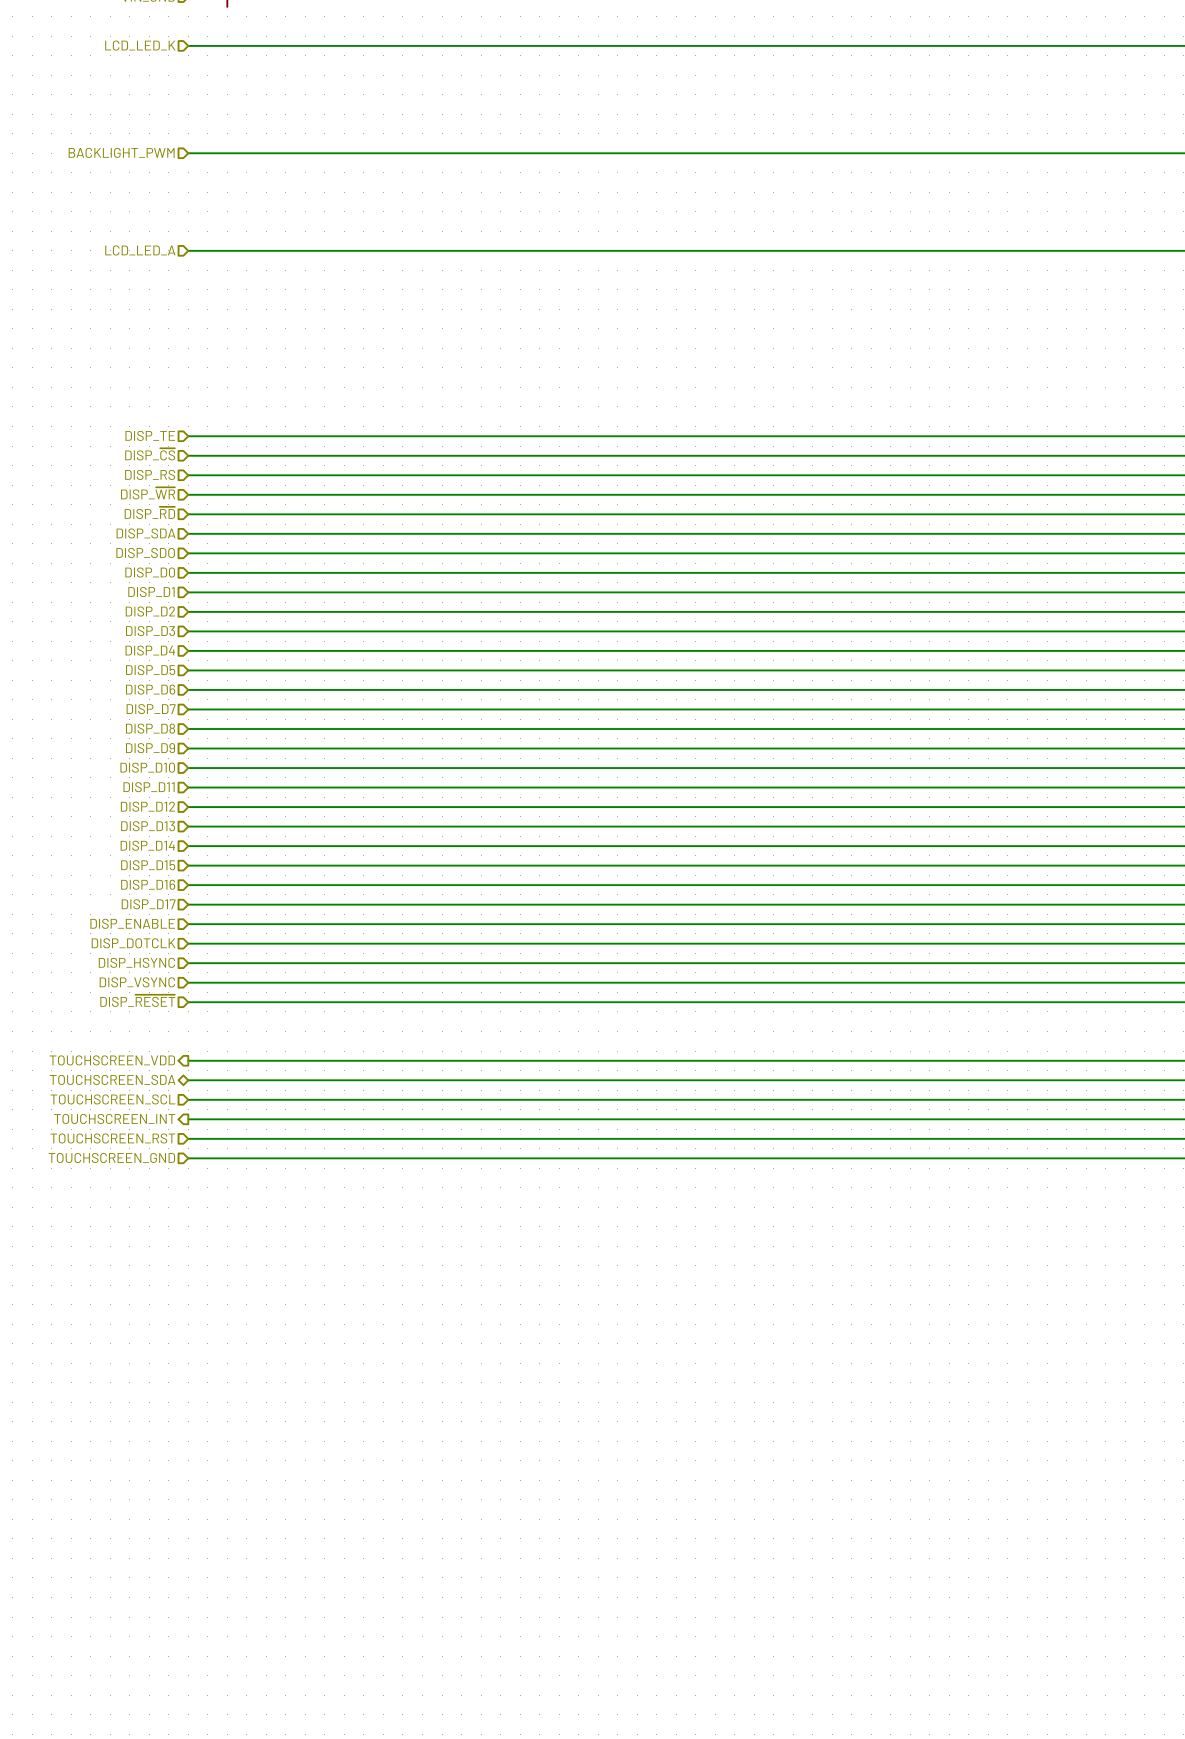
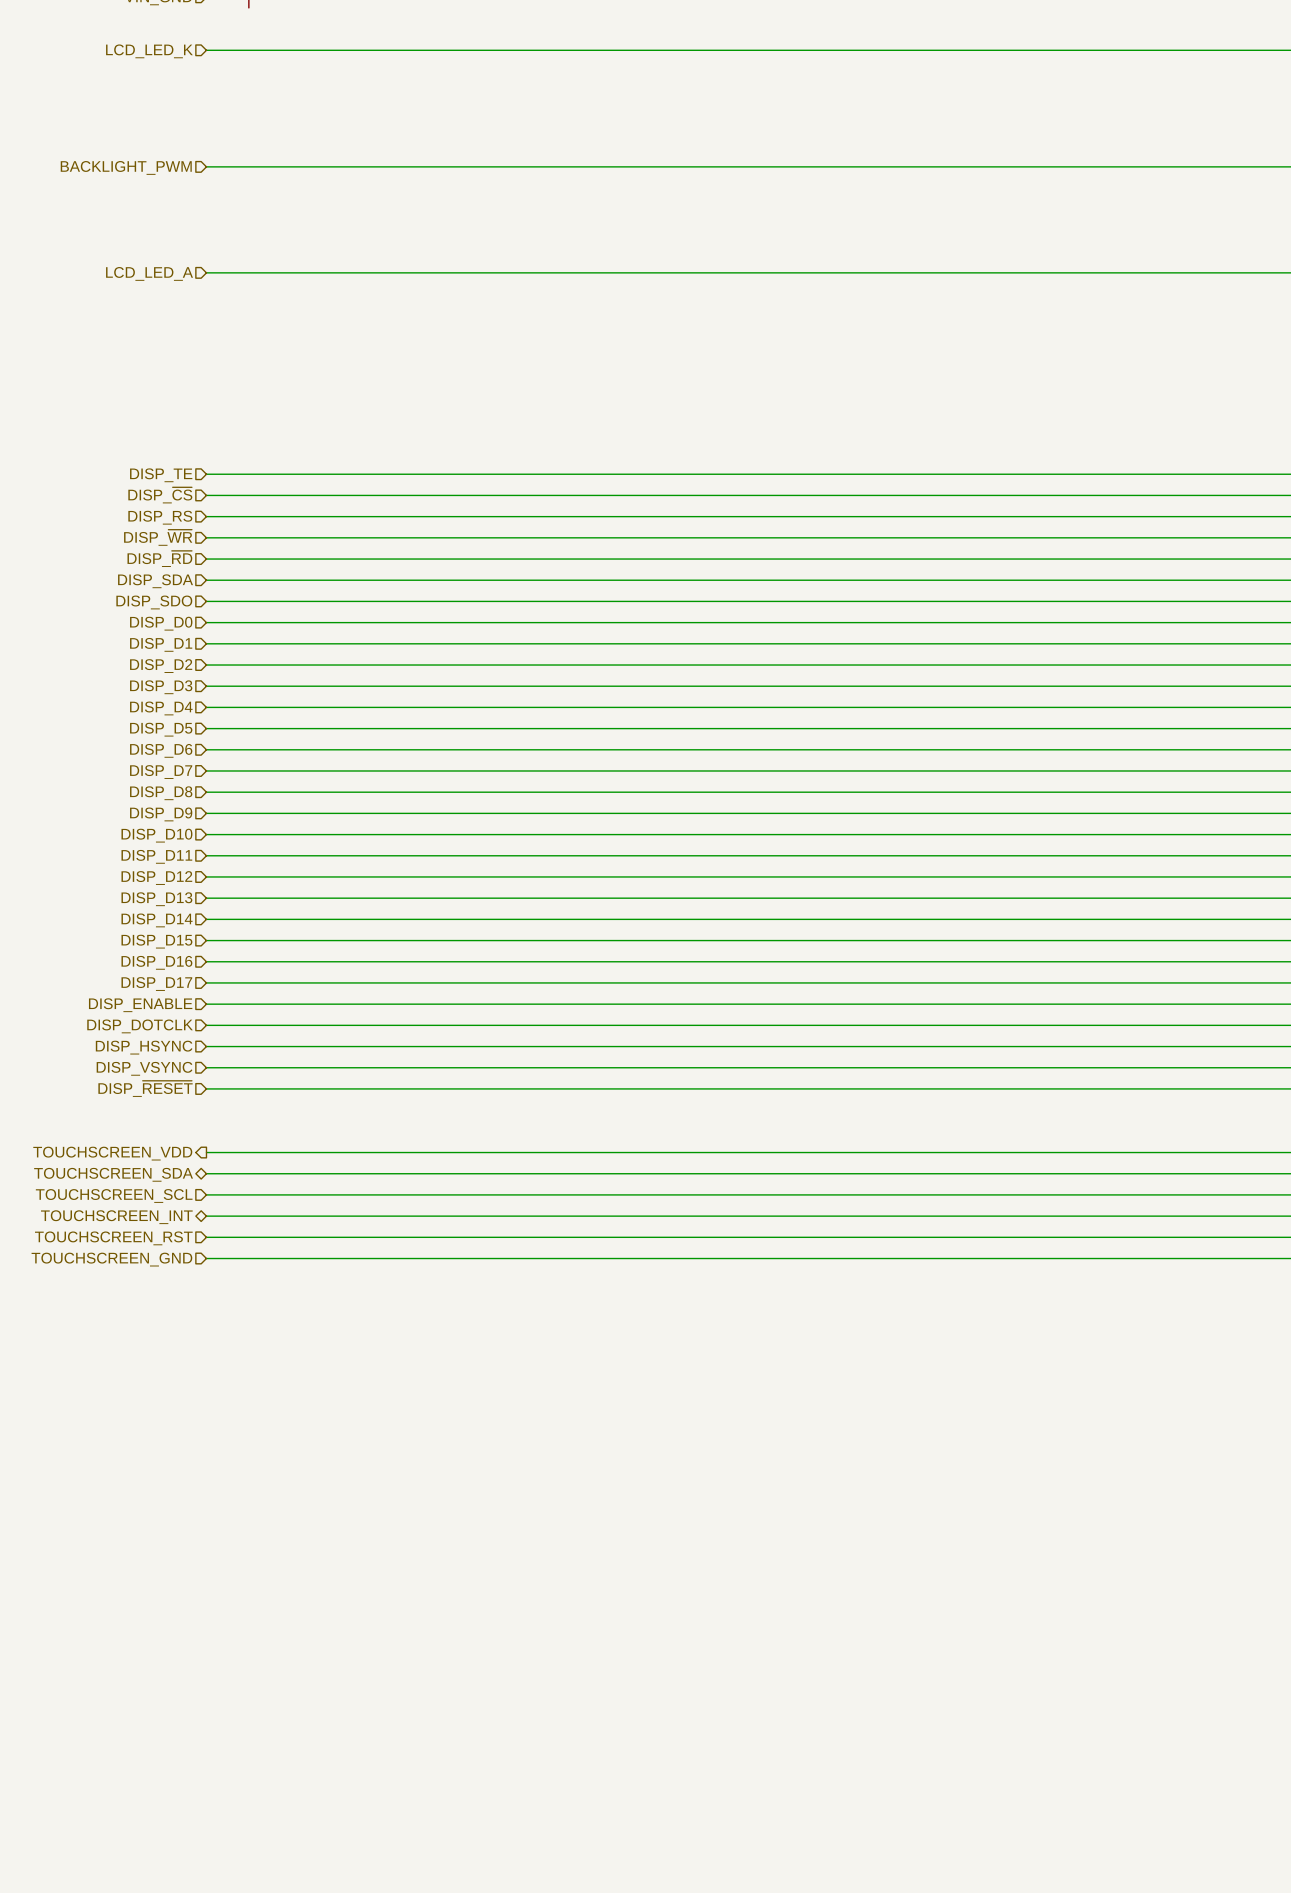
hierarchical label shape: output (114, 1118) -> bidirectional (116, 1217)

